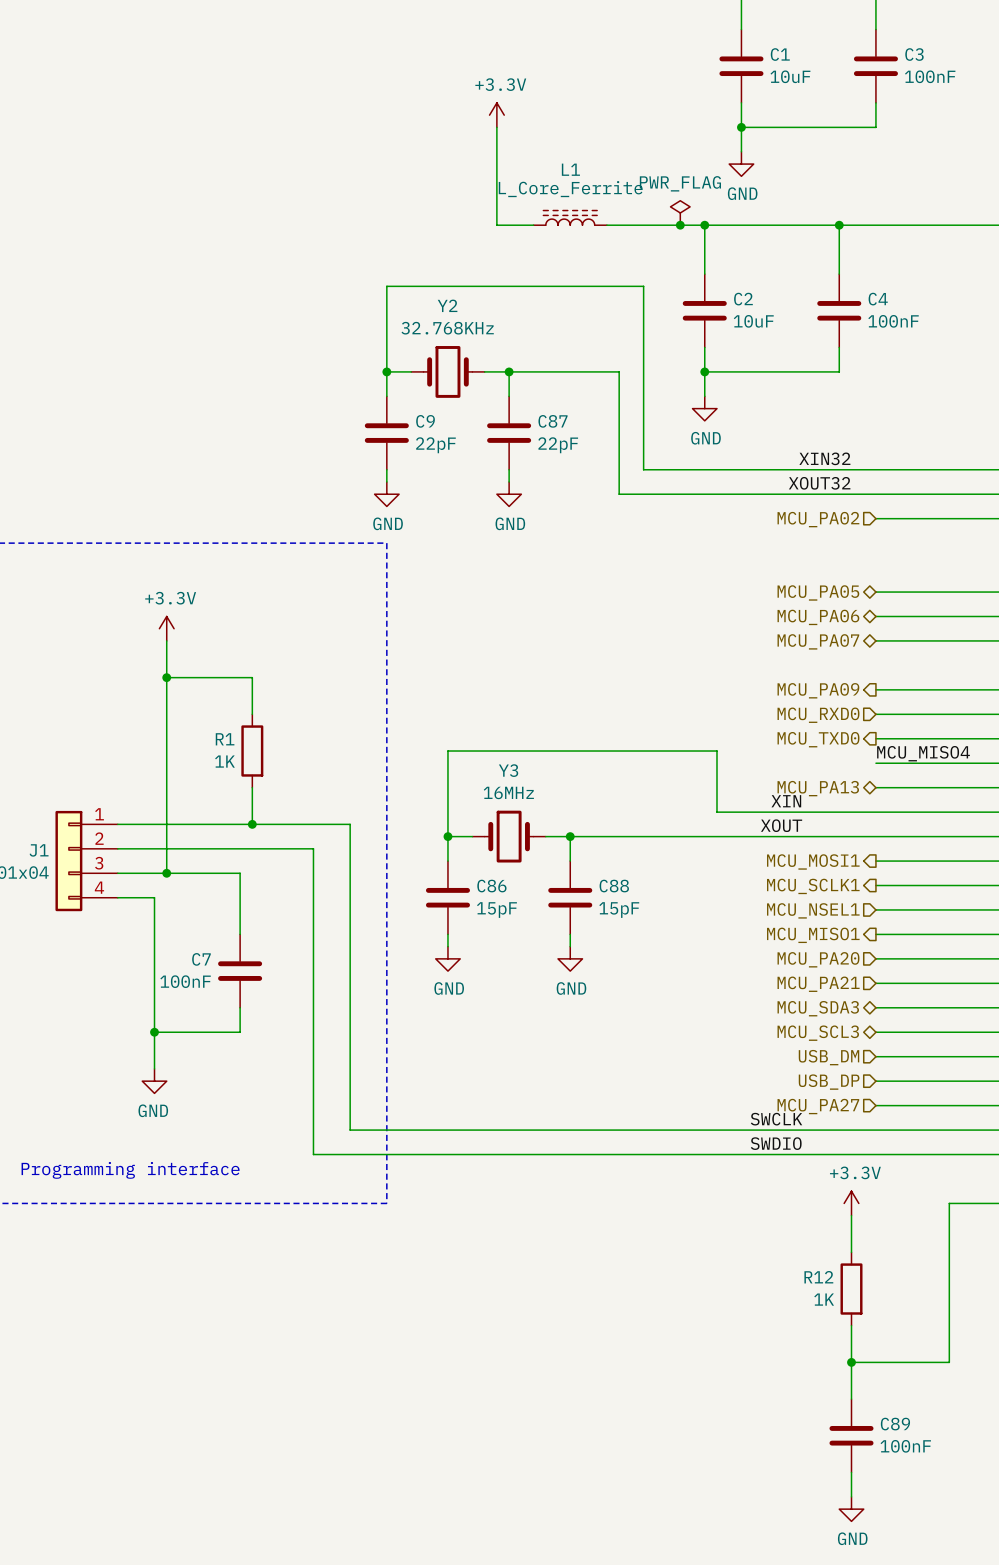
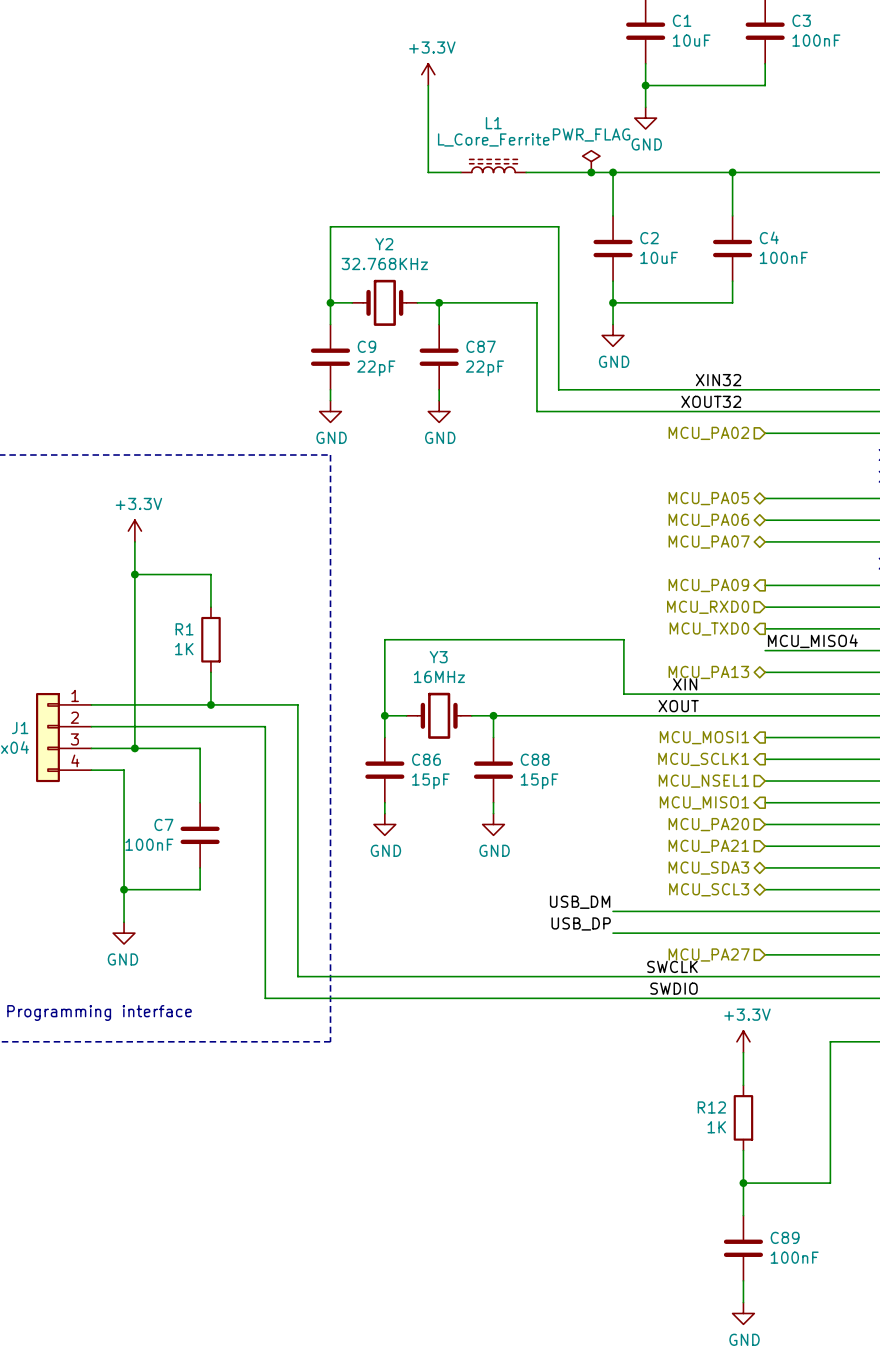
label: none -> USB_DM (580, 902)
wire: none -> (613, 911) (765, 911)
hierarchical label: USB_DM (828, 1057) -> none
label: none -> USB_DP (581, 923)
wire: none -> (613, 933) (765, 933)
hierarchical label: USB_DP (829, 1082) -> none

